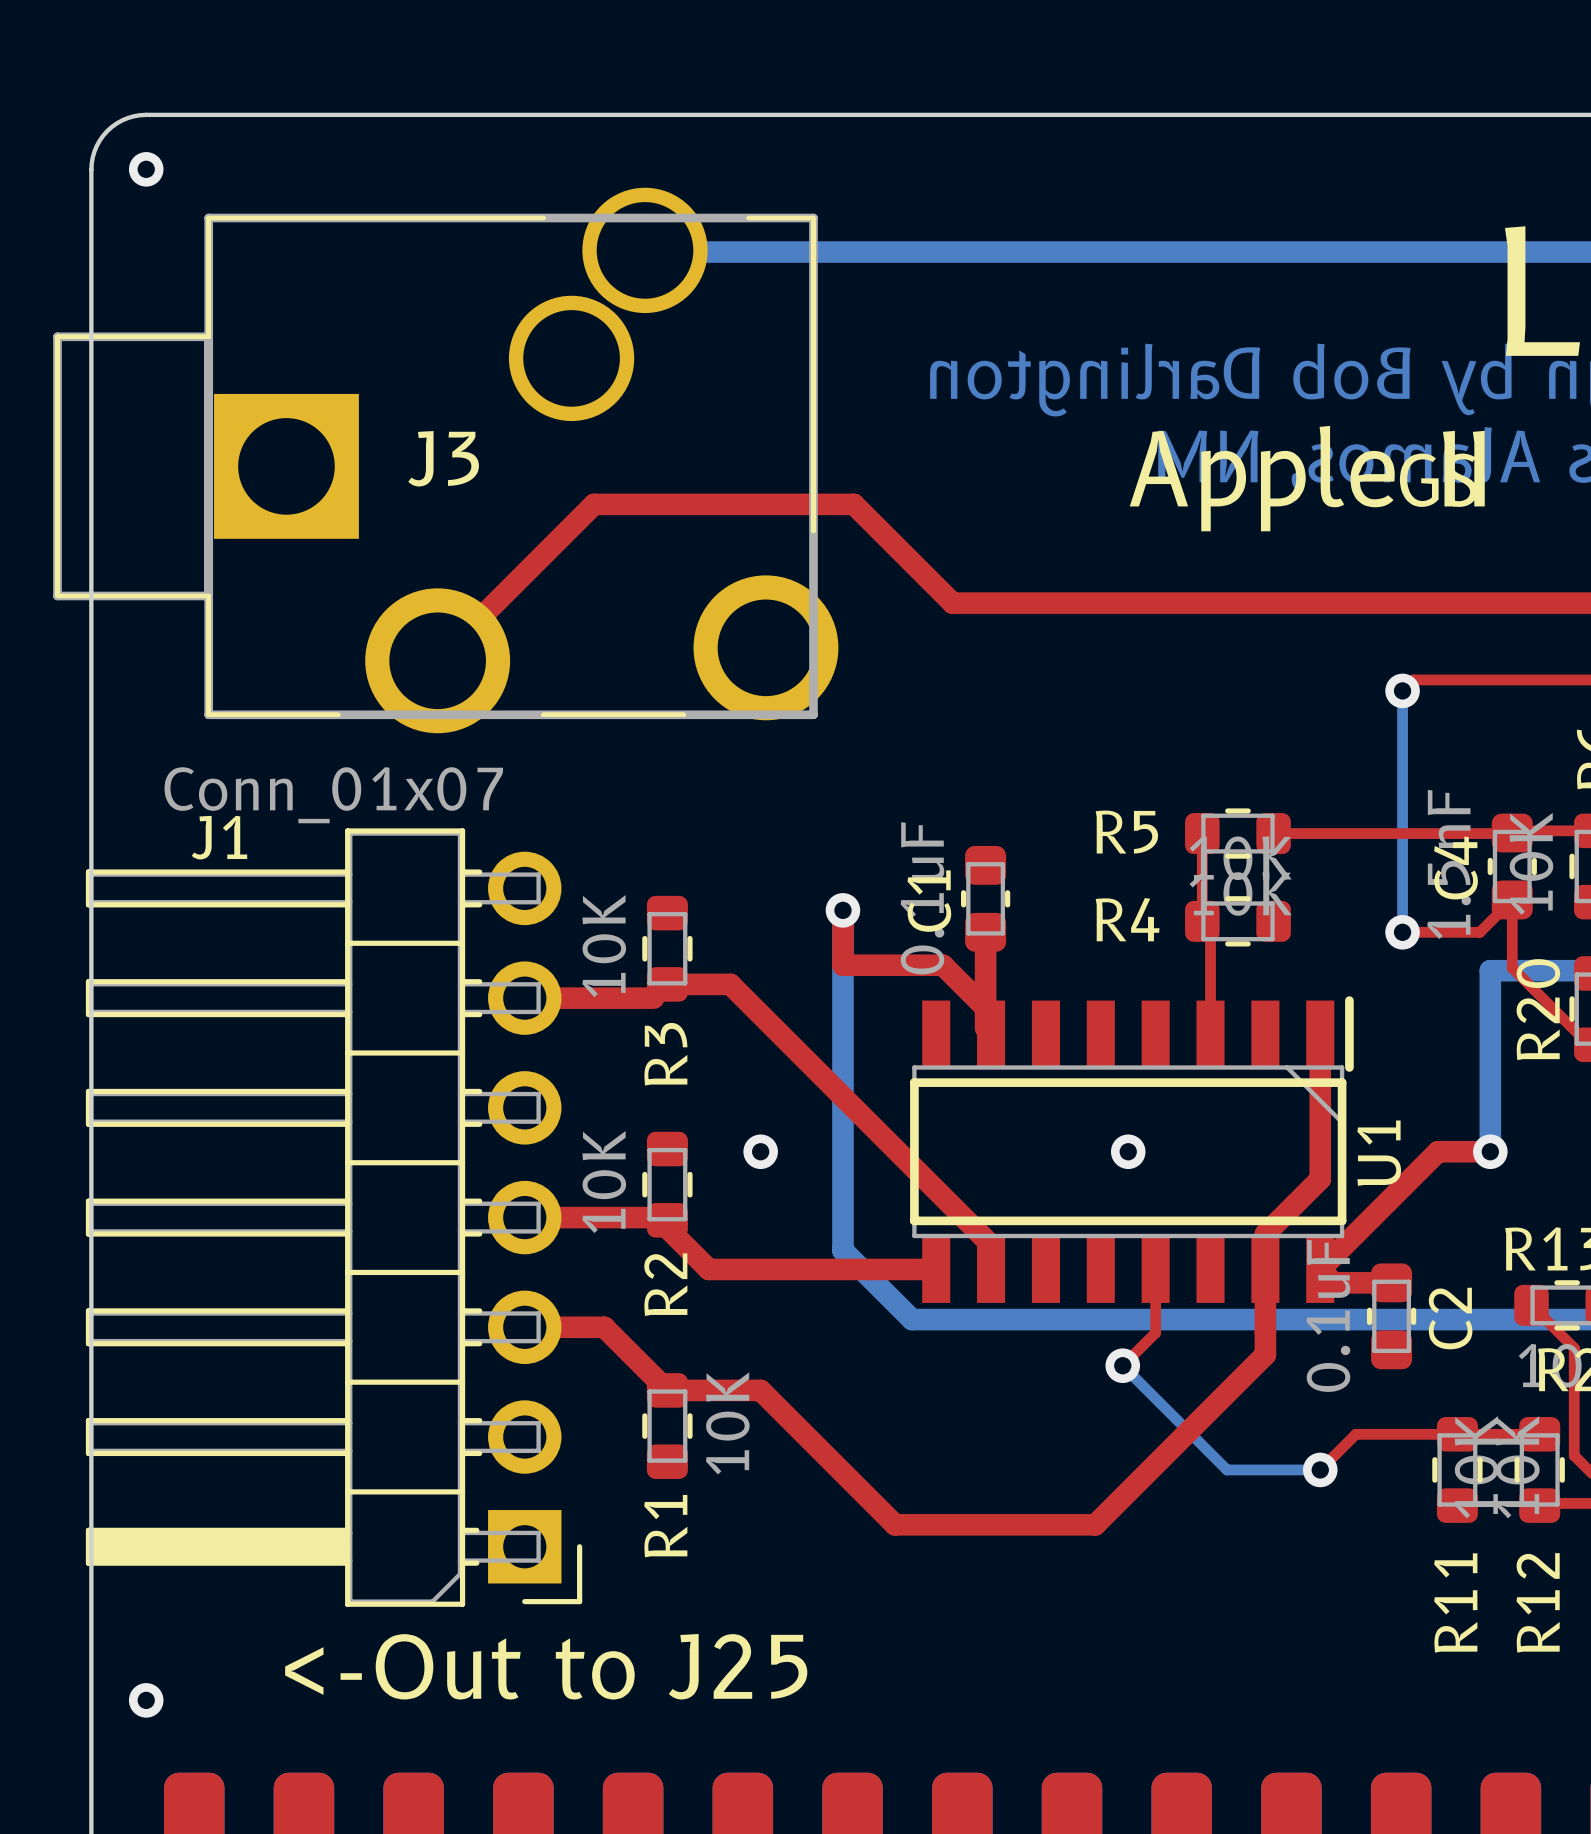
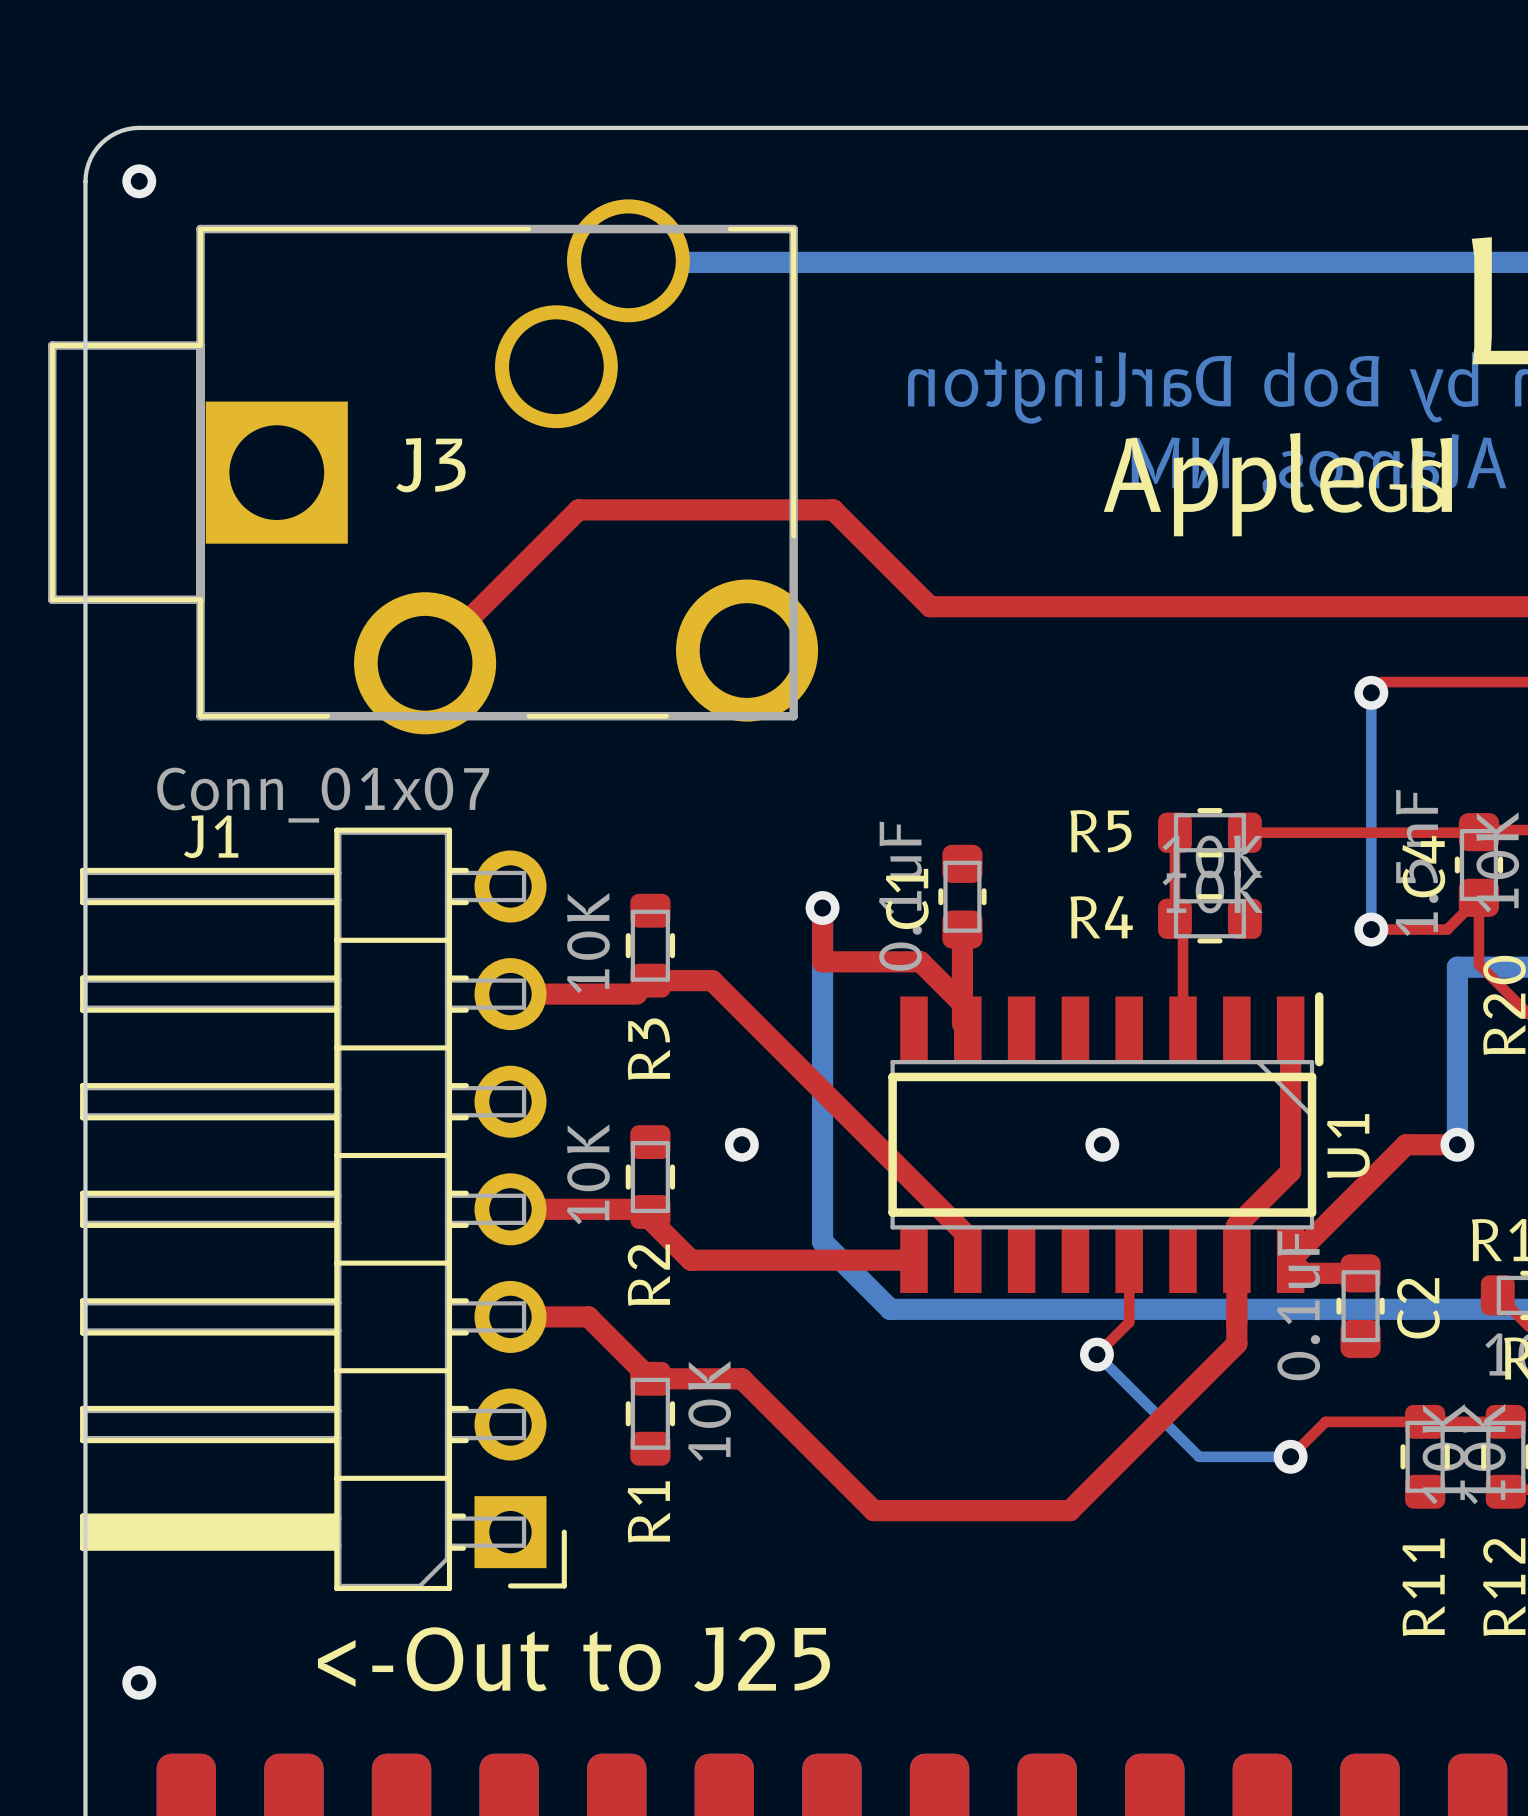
text position: <-Out to J25 (546, 1666) -> <-Out to J25 (574, 1659)

